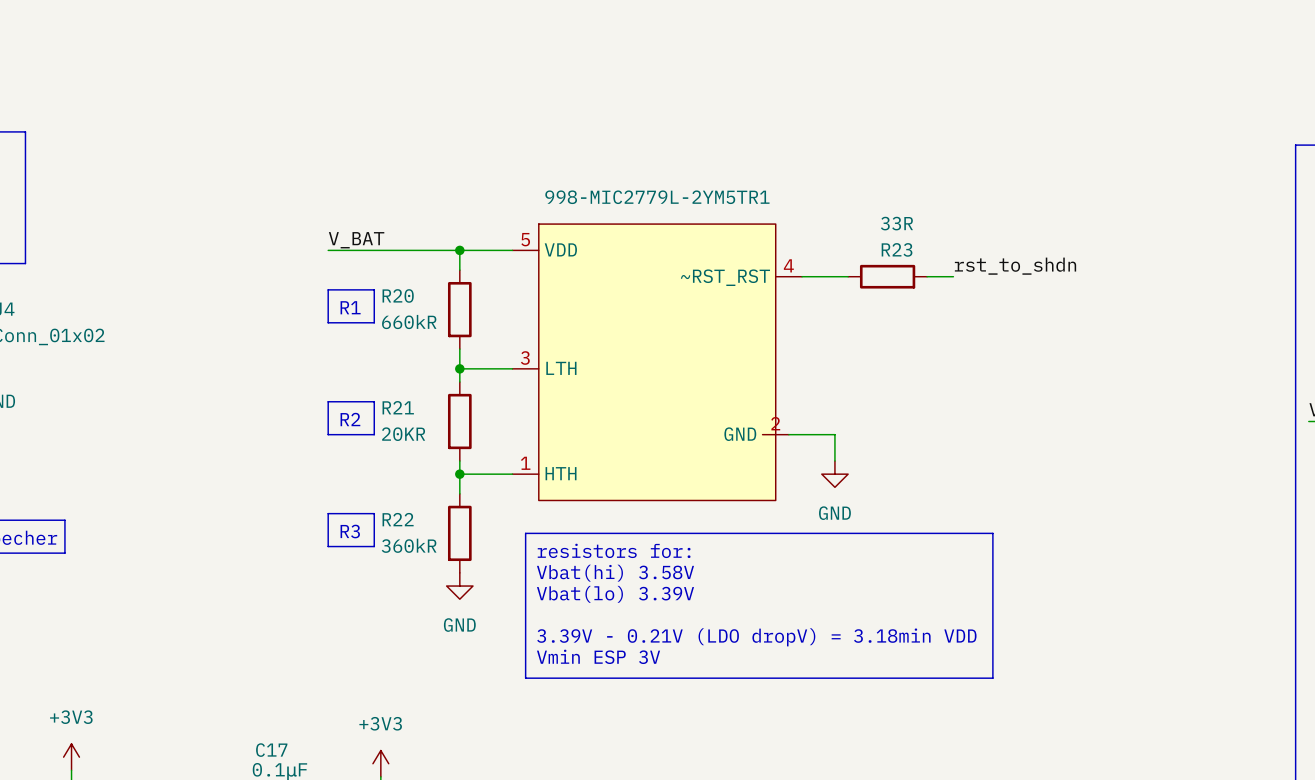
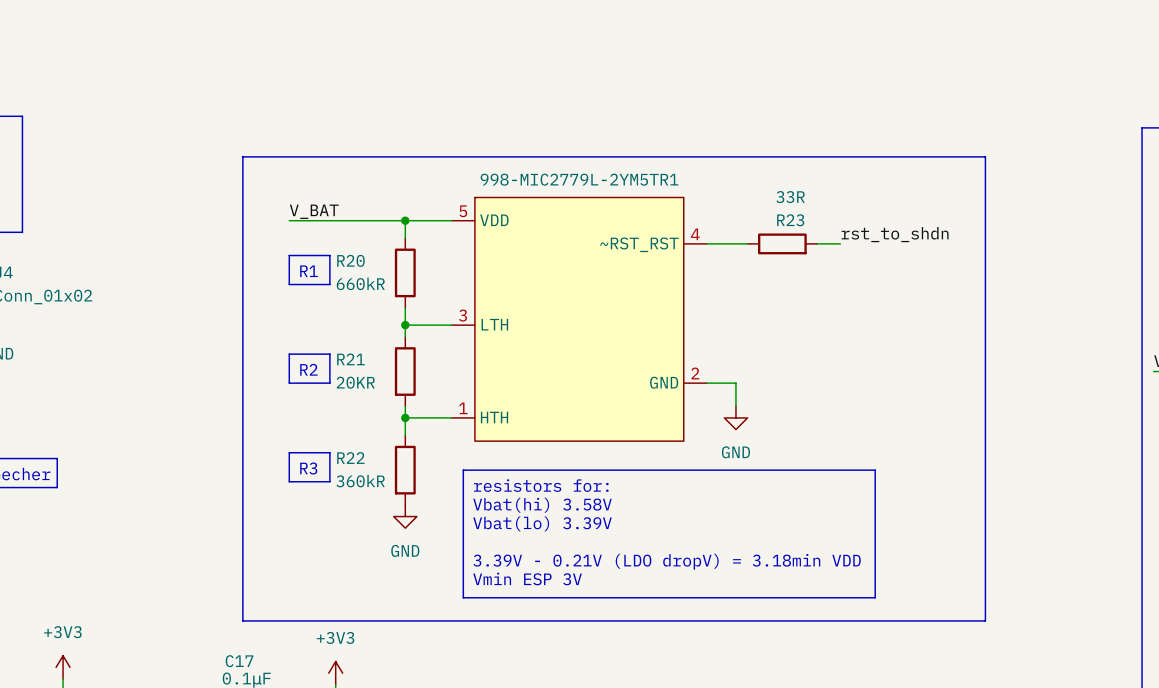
line: none -> (242, 156) (985, 156) (985, 620) (242, 620) (242, 156)
998-MIC2779L-2YM5TR1 symbol: [512, 224, 803, 501] -> [451, 197, 707, 442]

